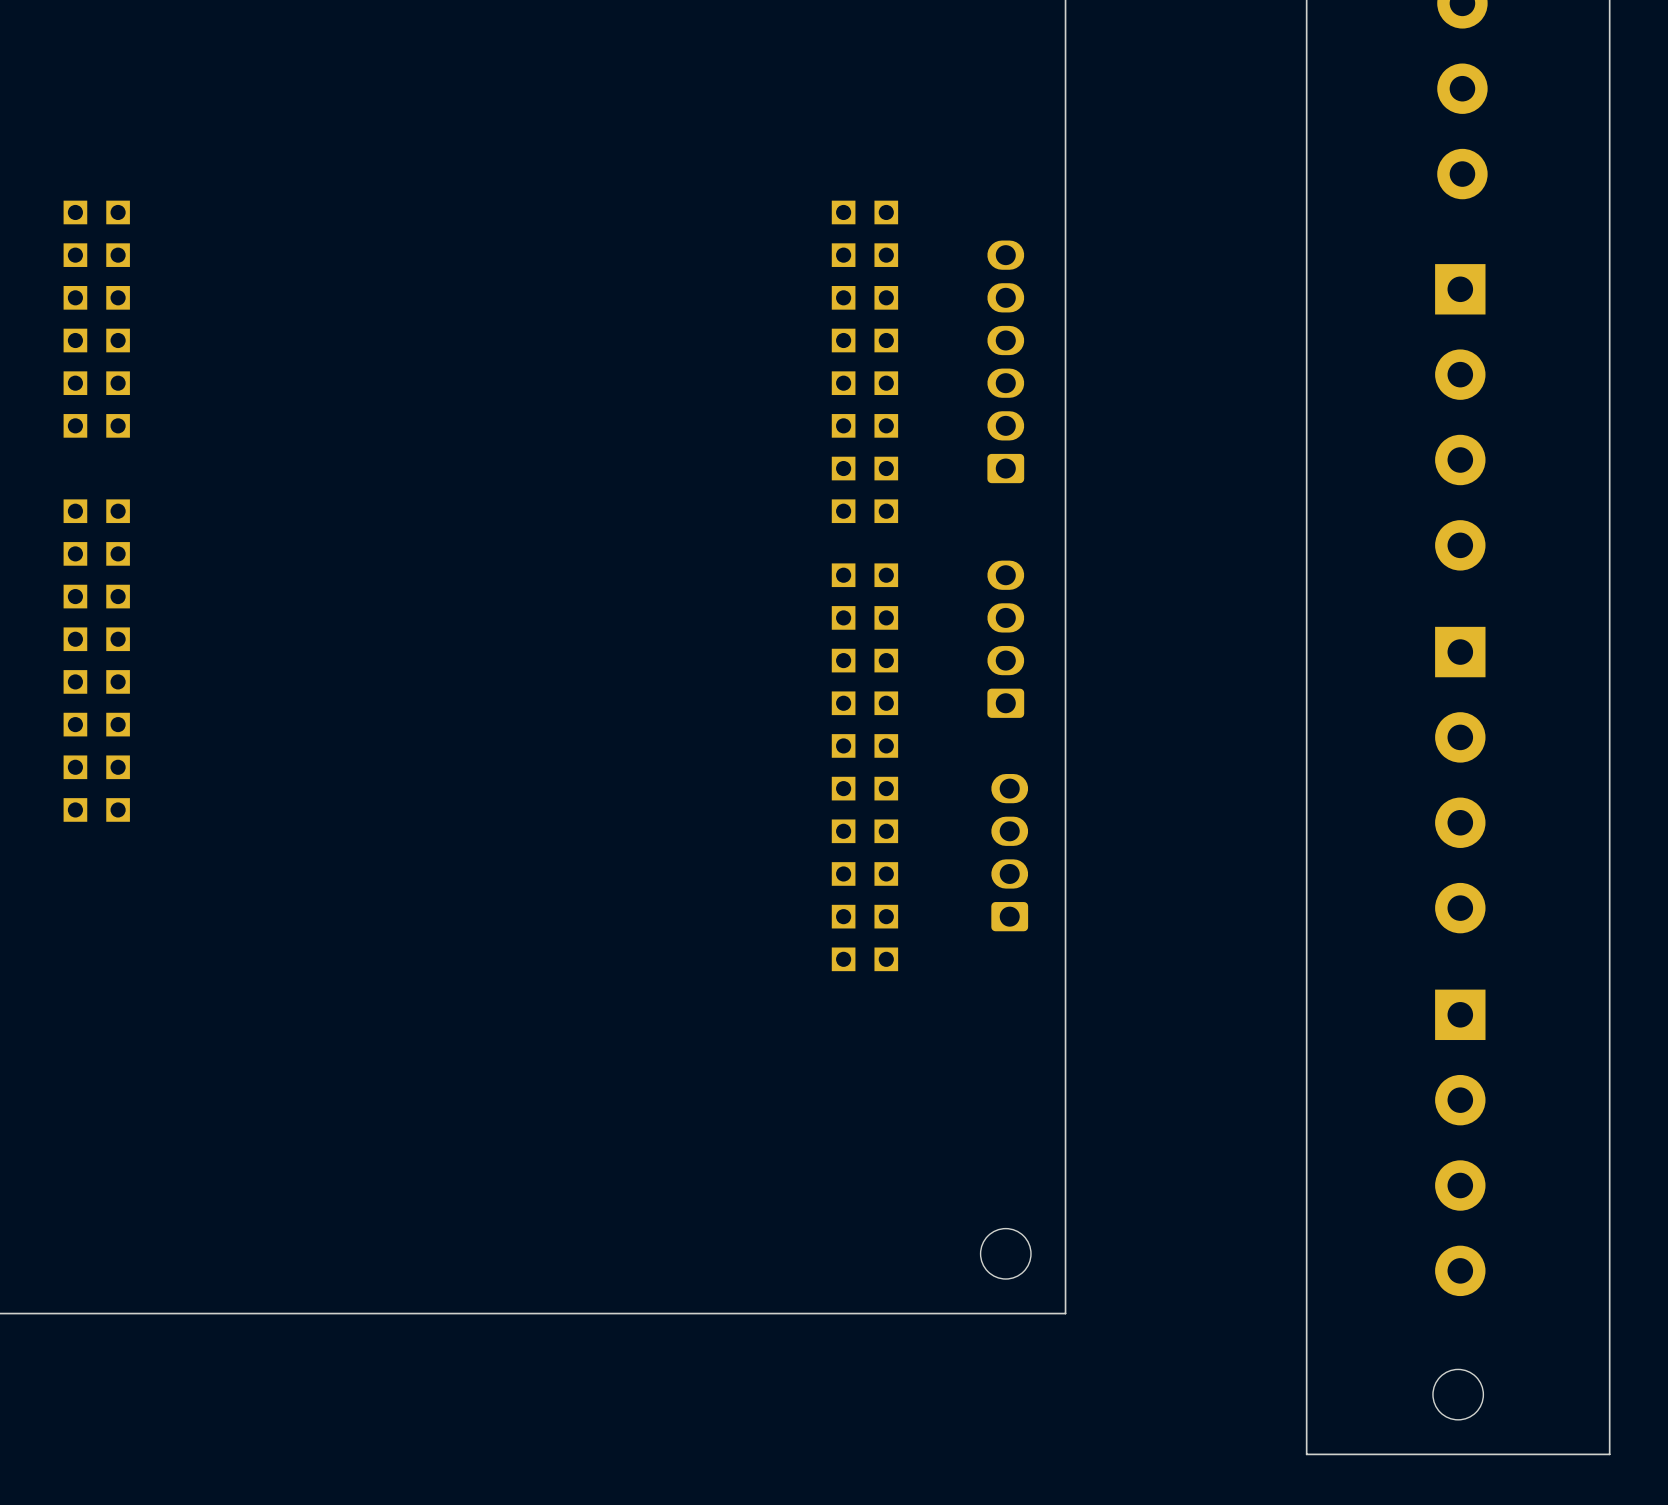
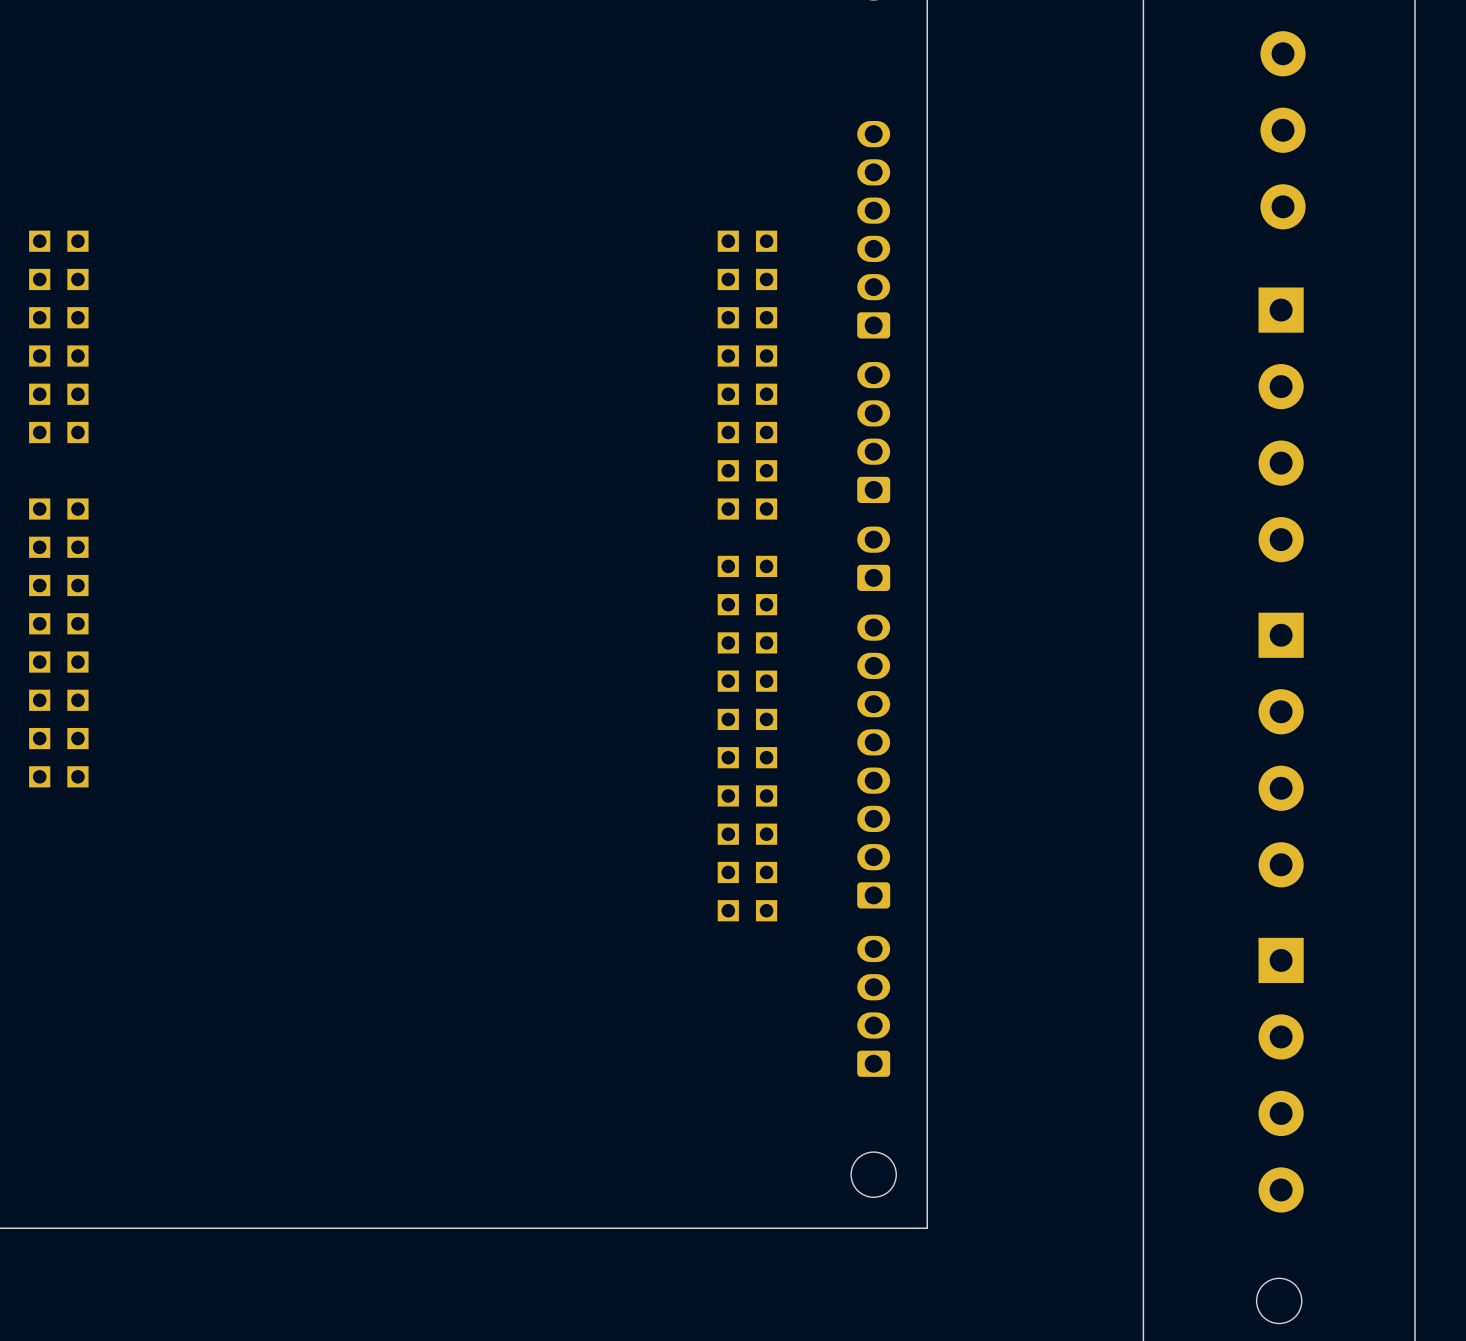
part position: (1005, 361) -> (873, 229)
part: none -> (873, 432)
part: none -> (873, 558)
part: (1005, 639) -> none
part: none -> (873, 761)
part: (1009, 852) -> none
part: none -> (873, 1006)

